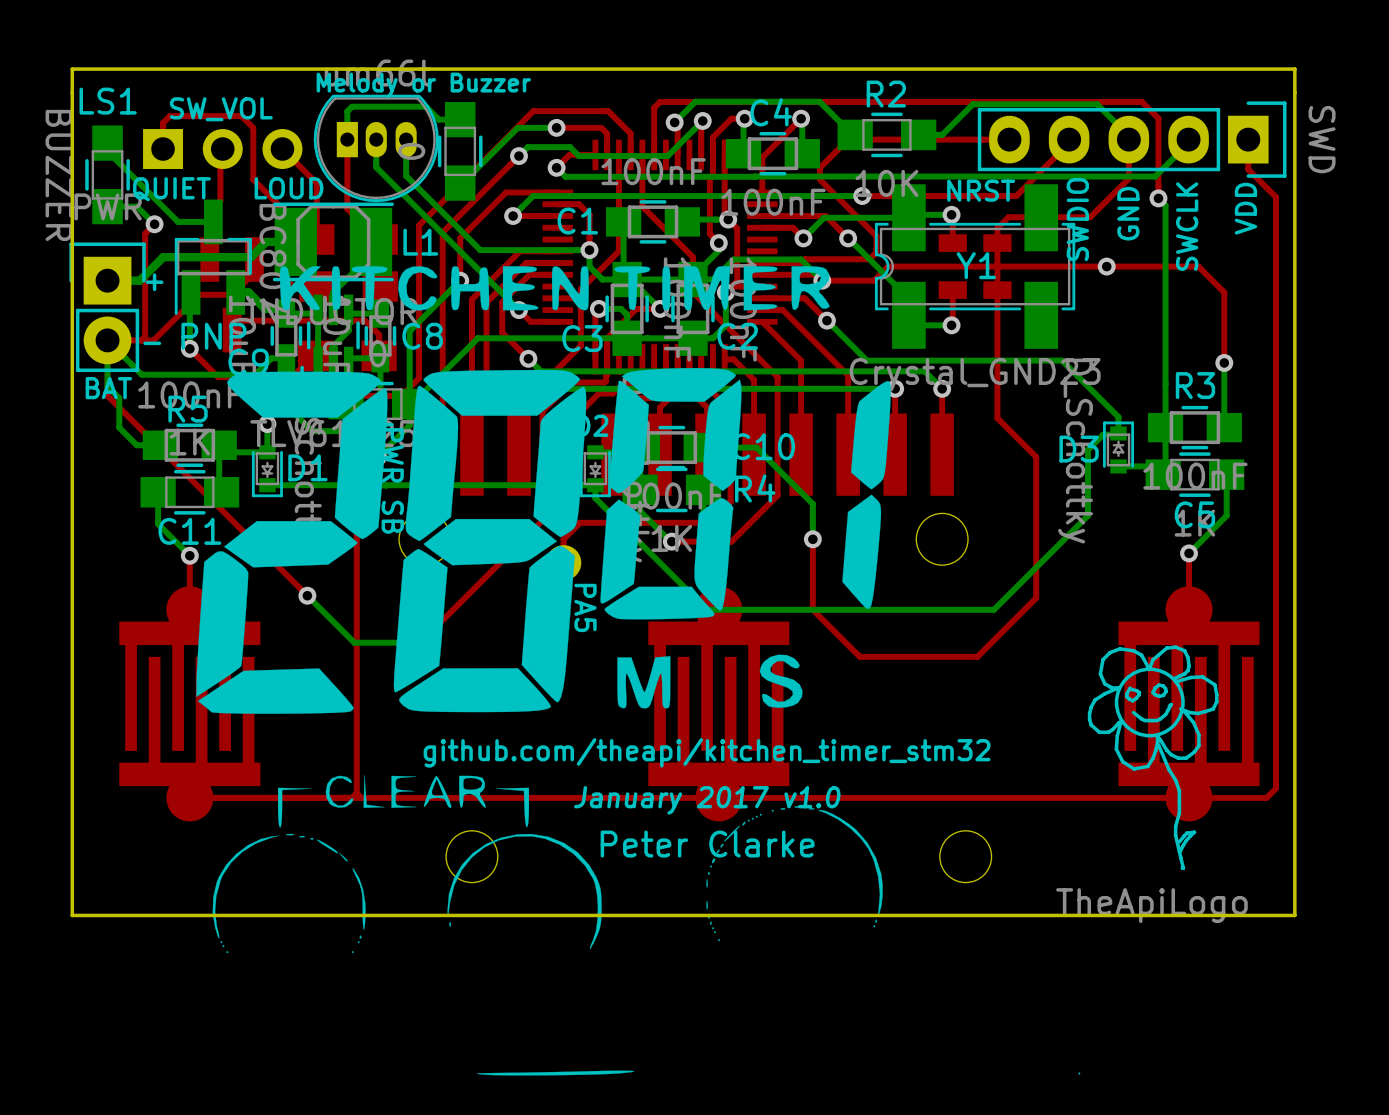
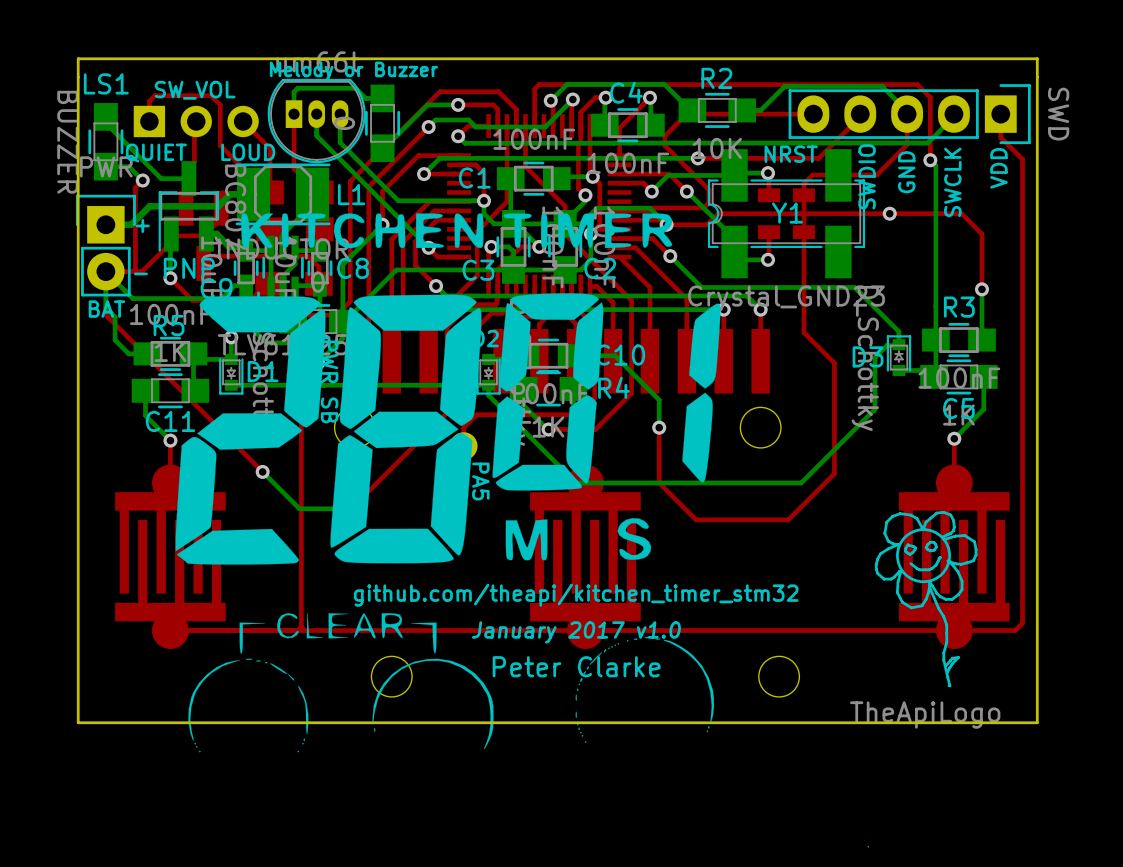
drawing shape: [196, 266, 1081, 1076] -> [175, 213, 870, 848]

